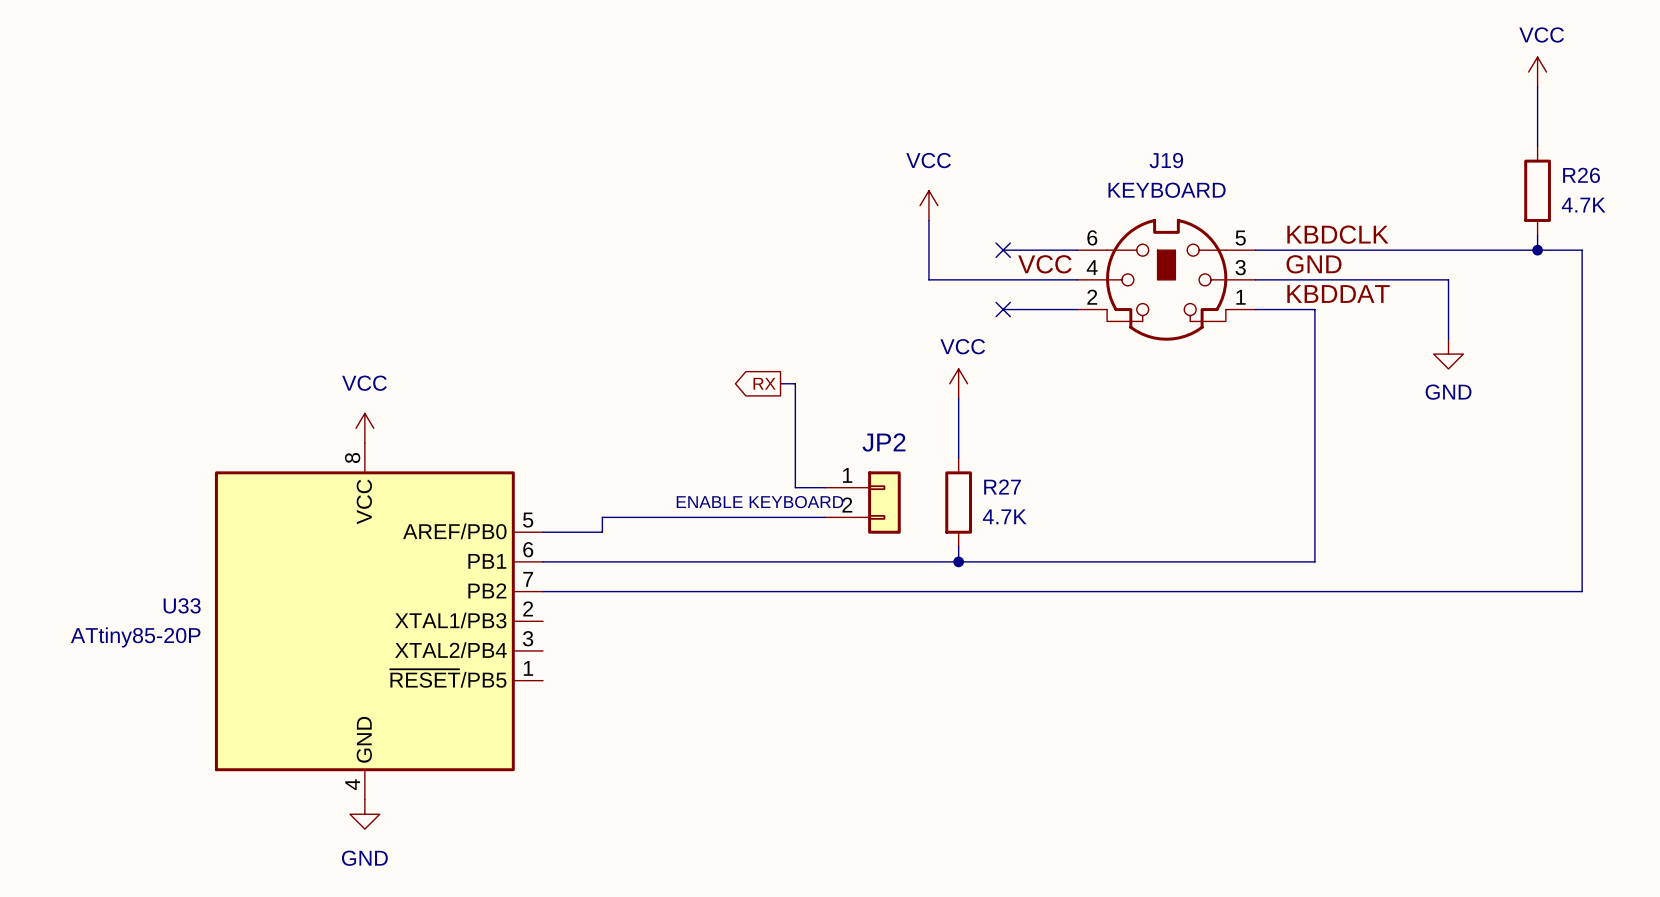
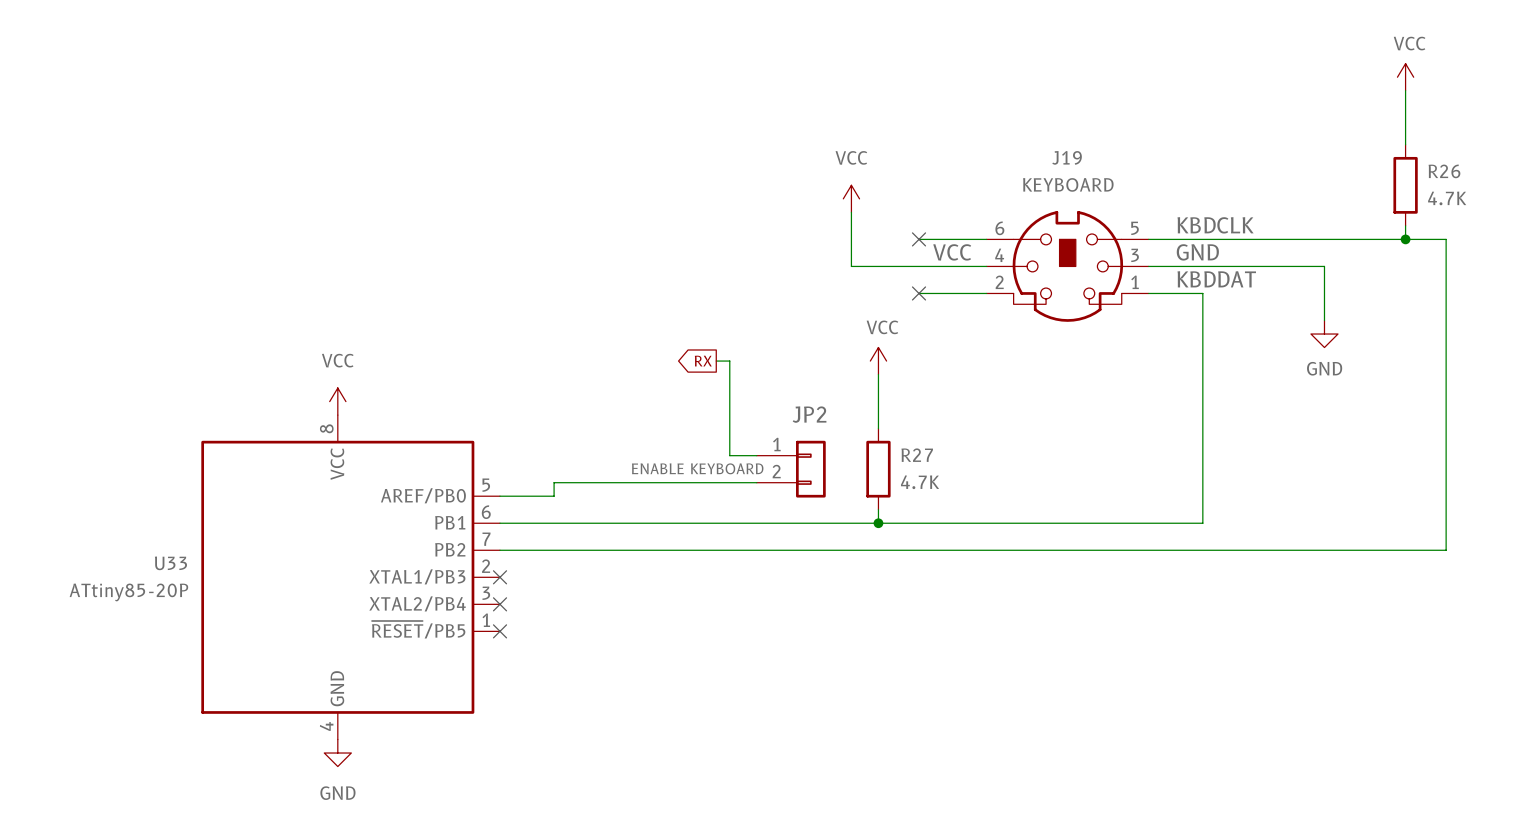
no-connect mark: none -> (500, 577)
no-connect mark: none -> (500, 604)
no-connect mark: none -> (500, 631)

